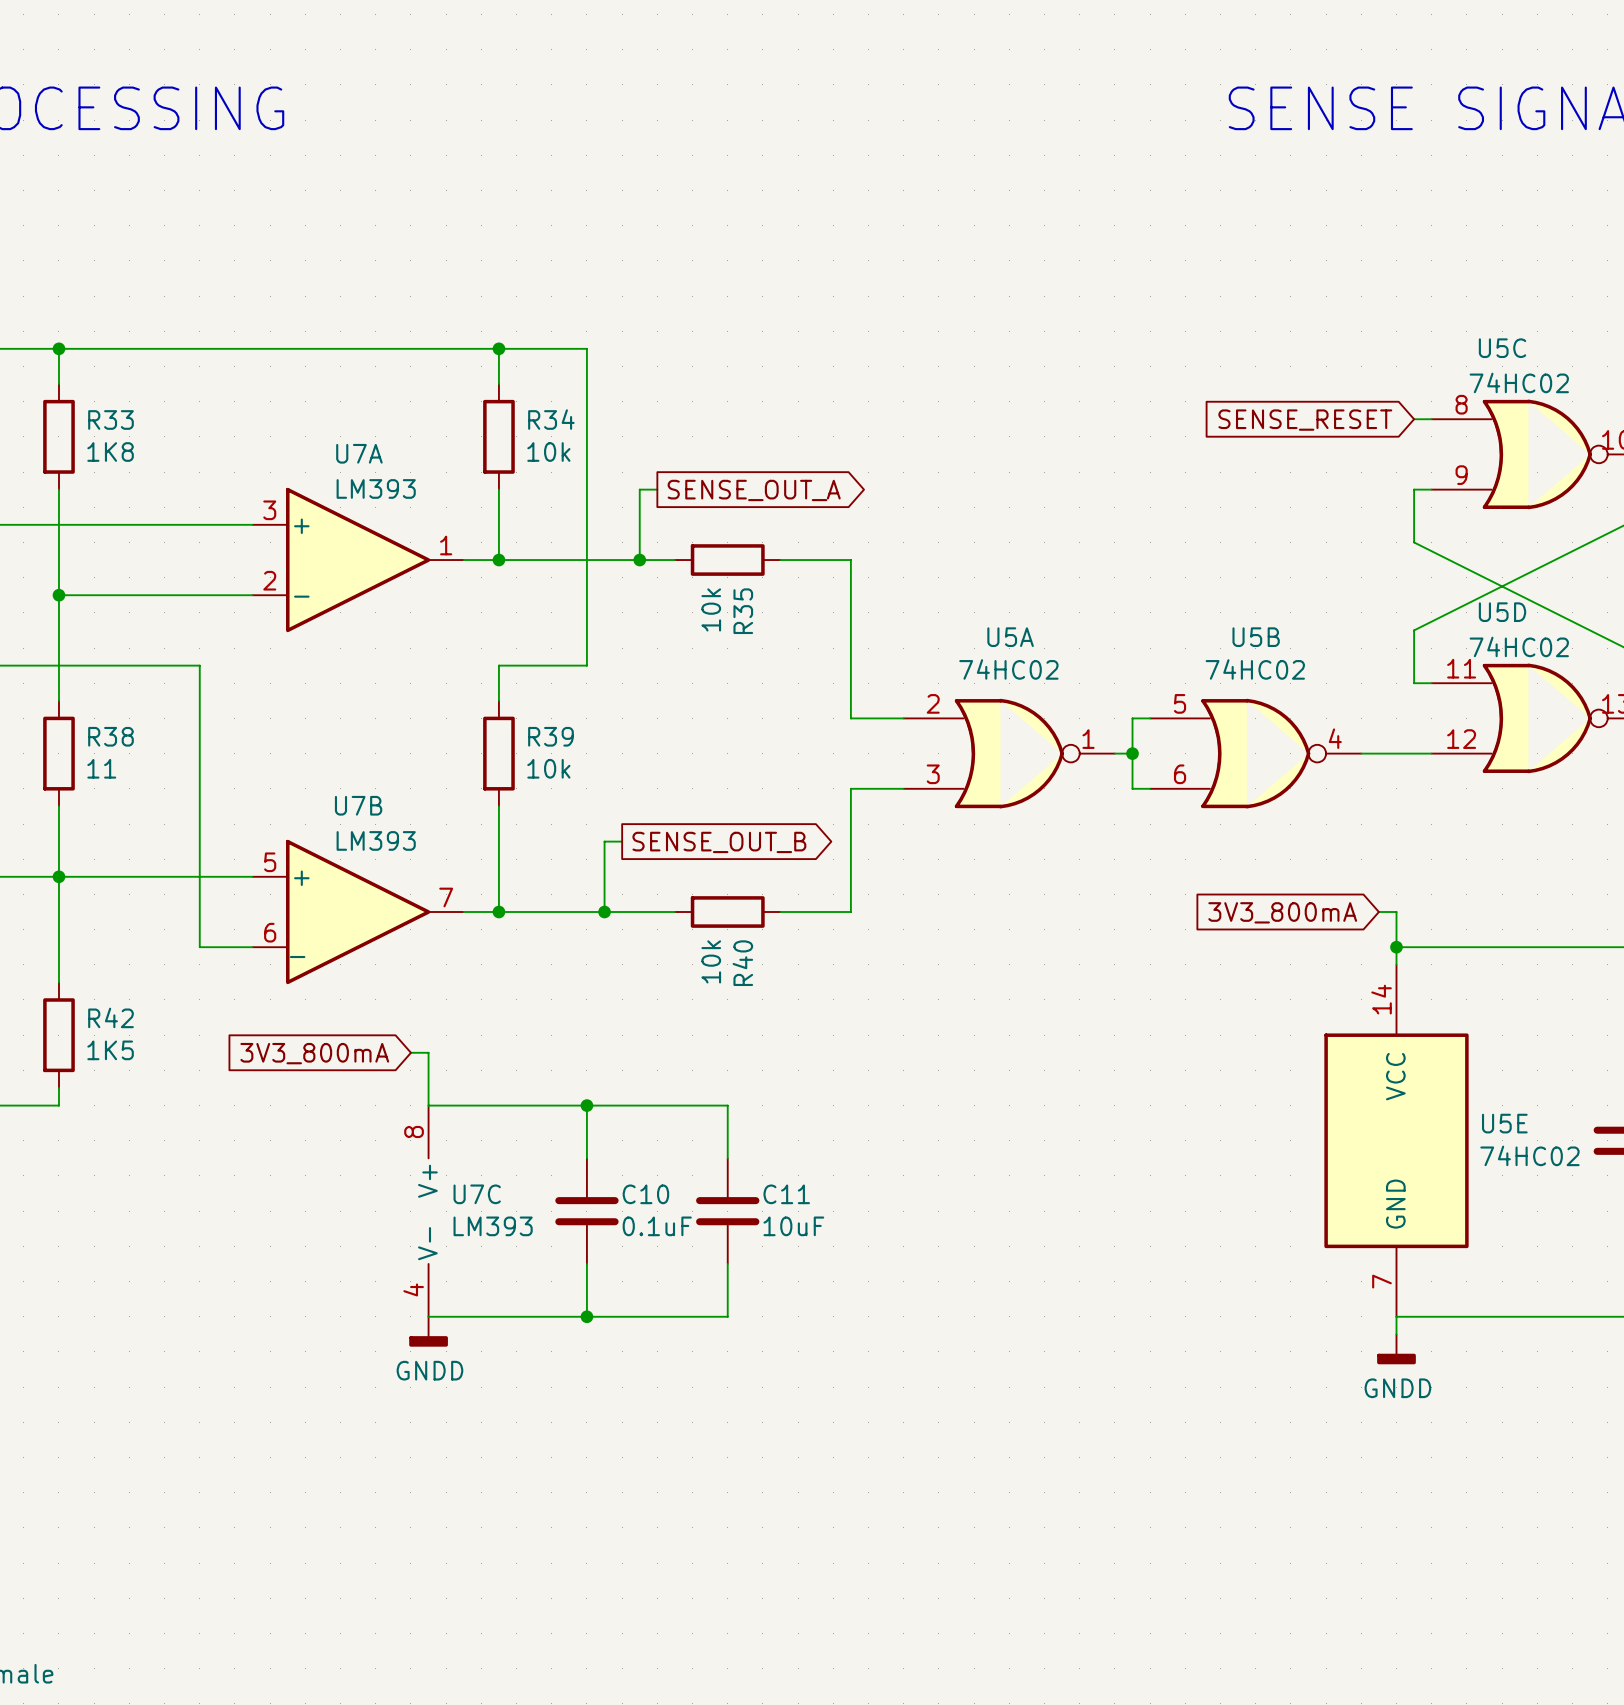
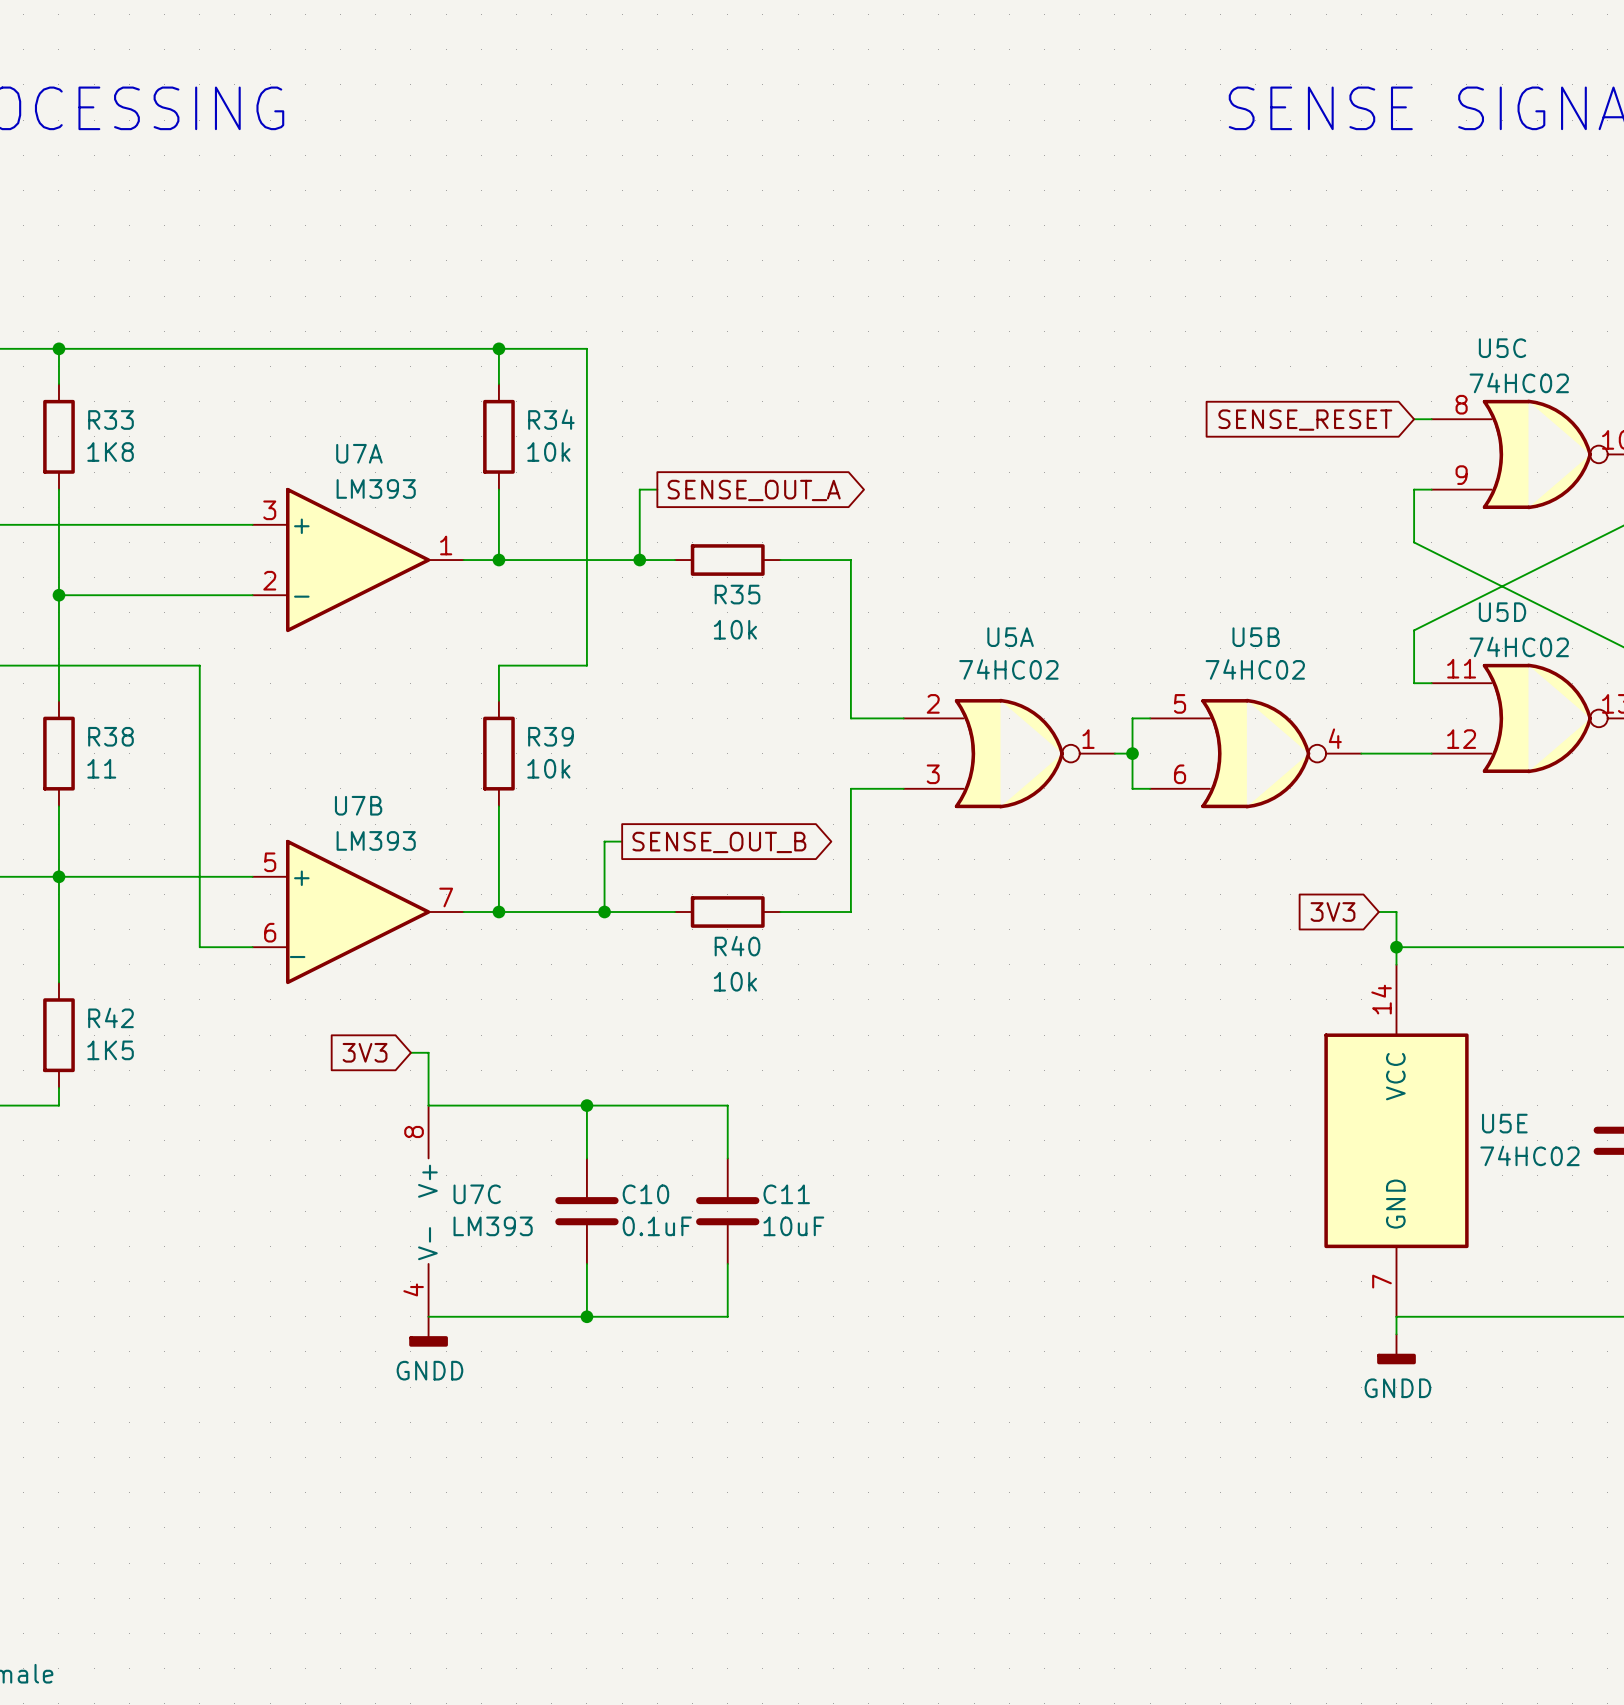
R35 value rotation: 0° (711, 609) -> 90° clockwise (735, 629)
R35 name rotation: 0° (743, 611) -> 90° clockwise (737, 594)
global label: 3V3_800mA (1282, 912) -> 3V3 (1332, 912)
R40 value rotation: 0° (711, 961) -> 90° clockwise (735, 981)
R40 name rotation: 0° (742, 963) -> 90° clockwise (737, 946)
global label: 3V3_800mA (314, 1053) -> 3V3 (365, 1052)

